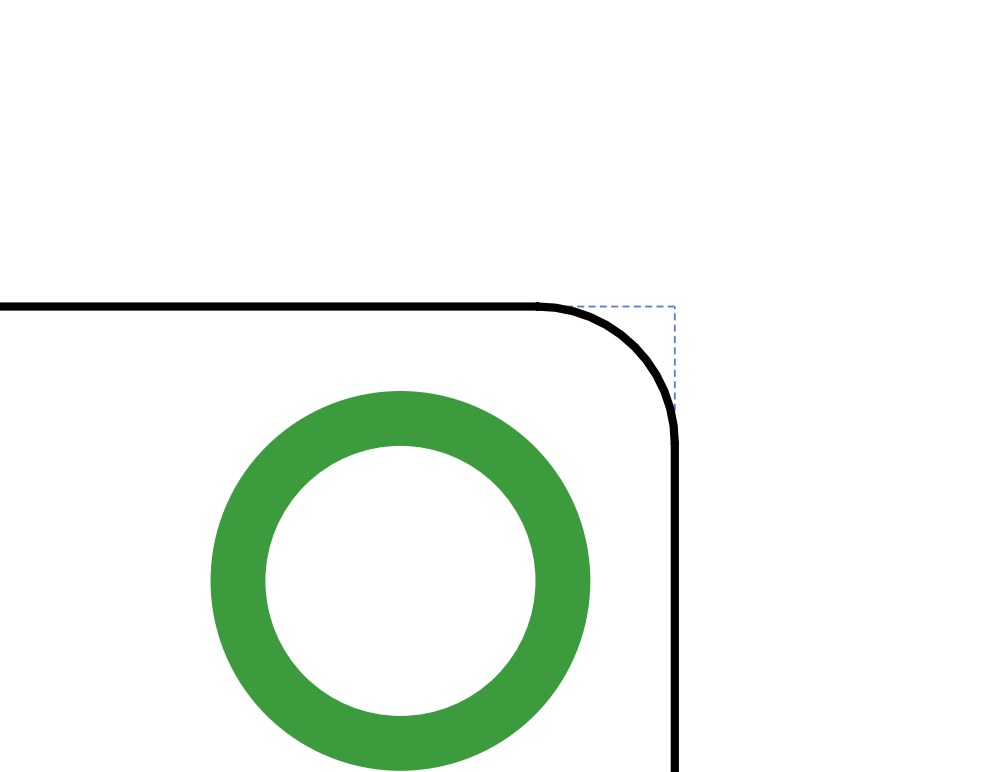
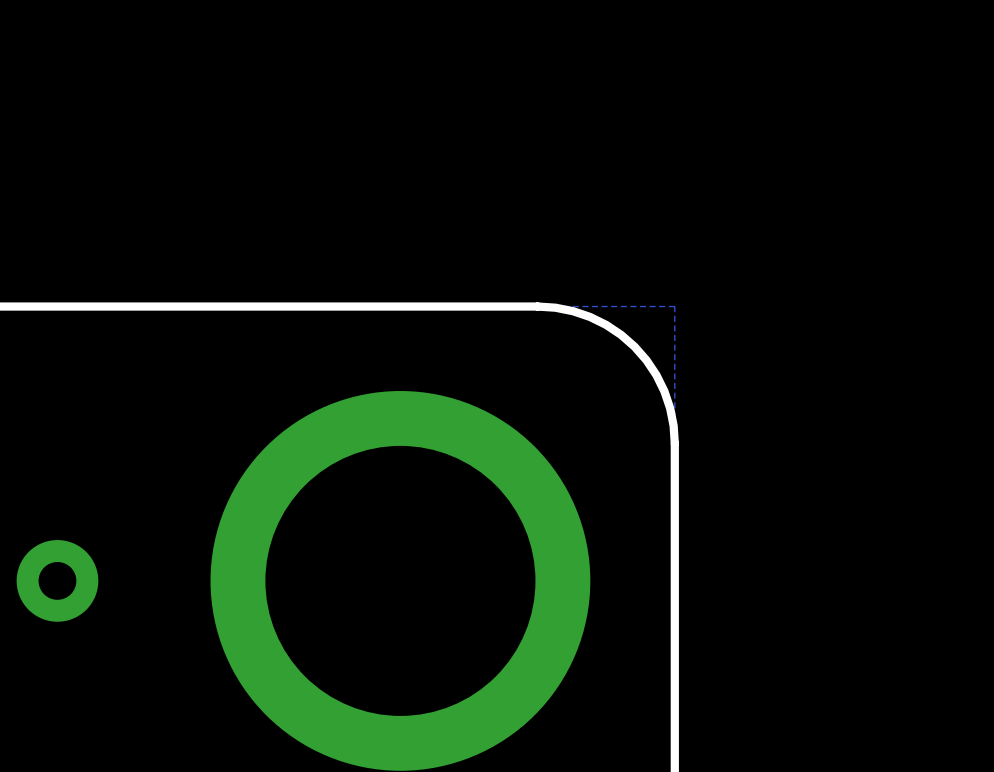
via: none -> (57, 580)

